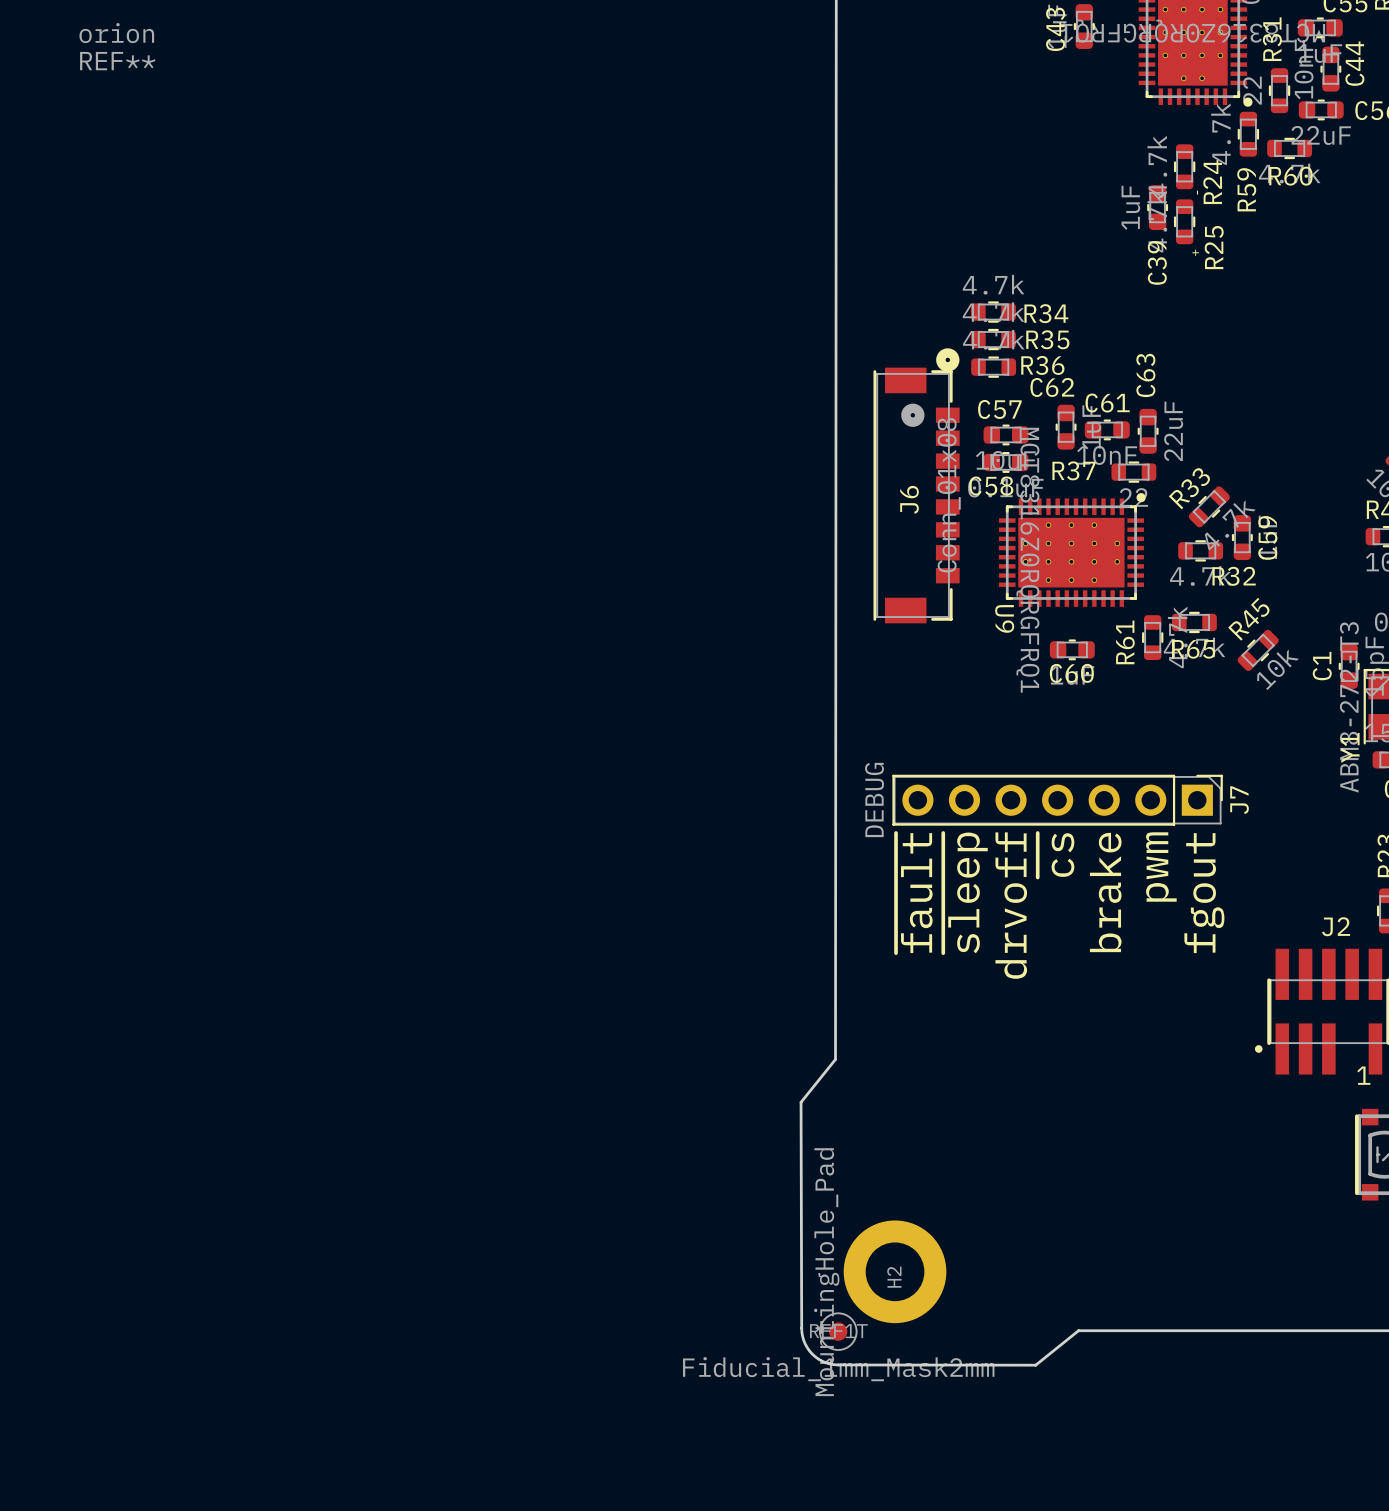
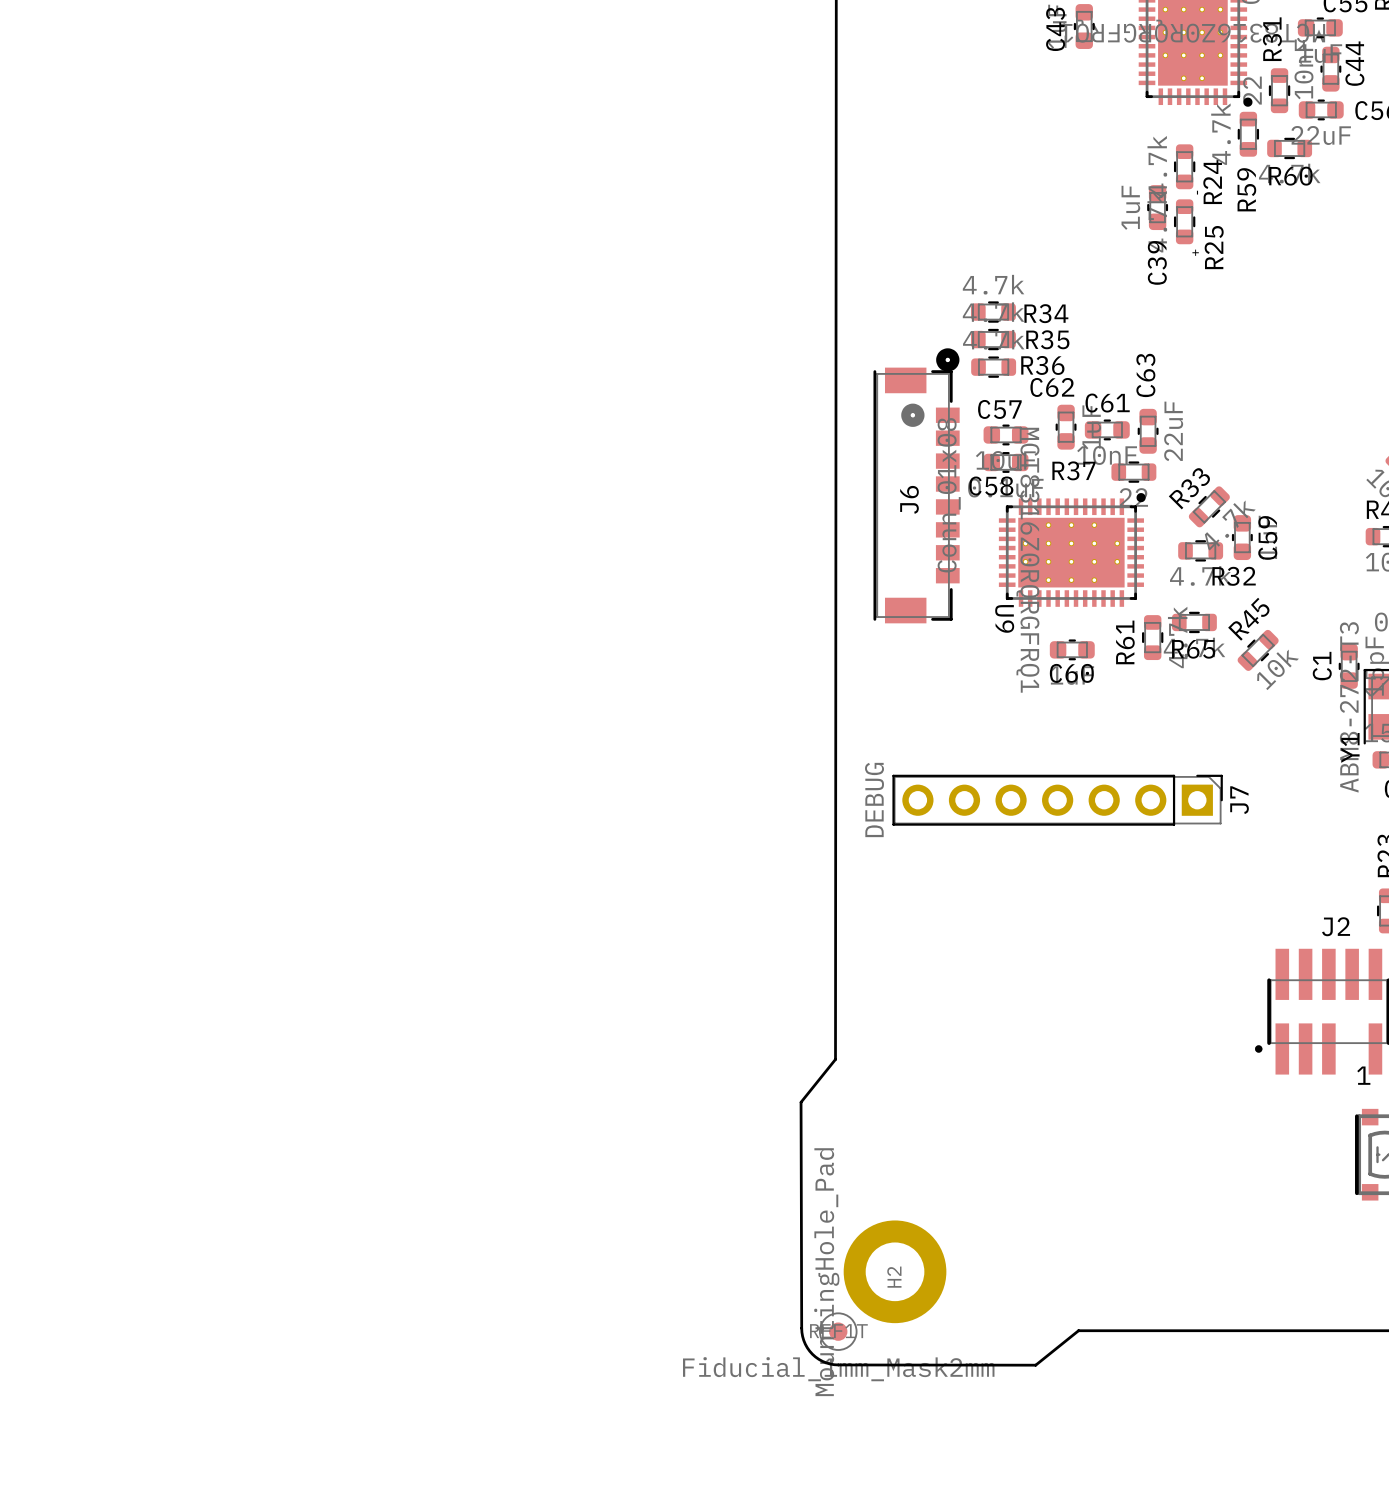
REF**: orion (117, 46) -> none
text: ~{cs} (1056, 855) -> none
text: pwm (1161, 867) -> none
text: ~{sleep} (965, 892) -> none
text: brake (1105, 892) -> none
text: ~{fault} (914, 893) -> none
text: fgout (1204, 893) -> none
text: drvoff (1011, 905) -> none

